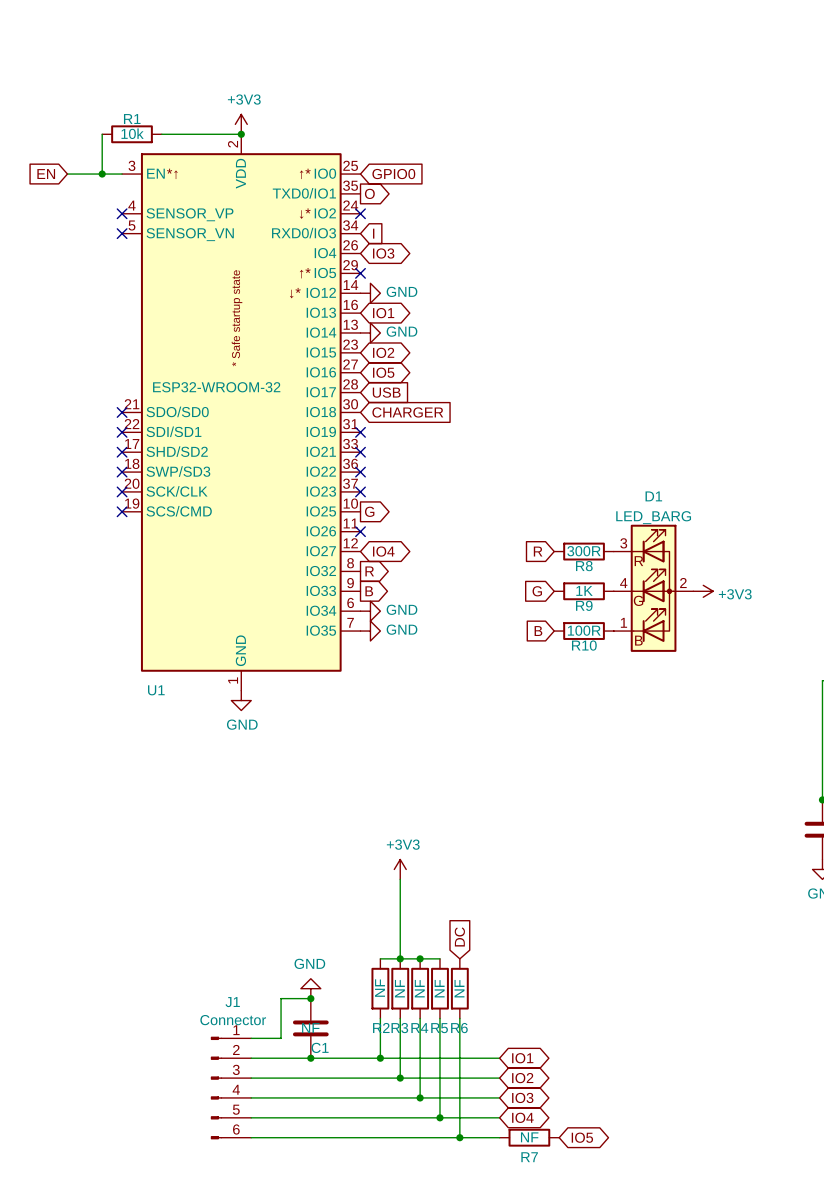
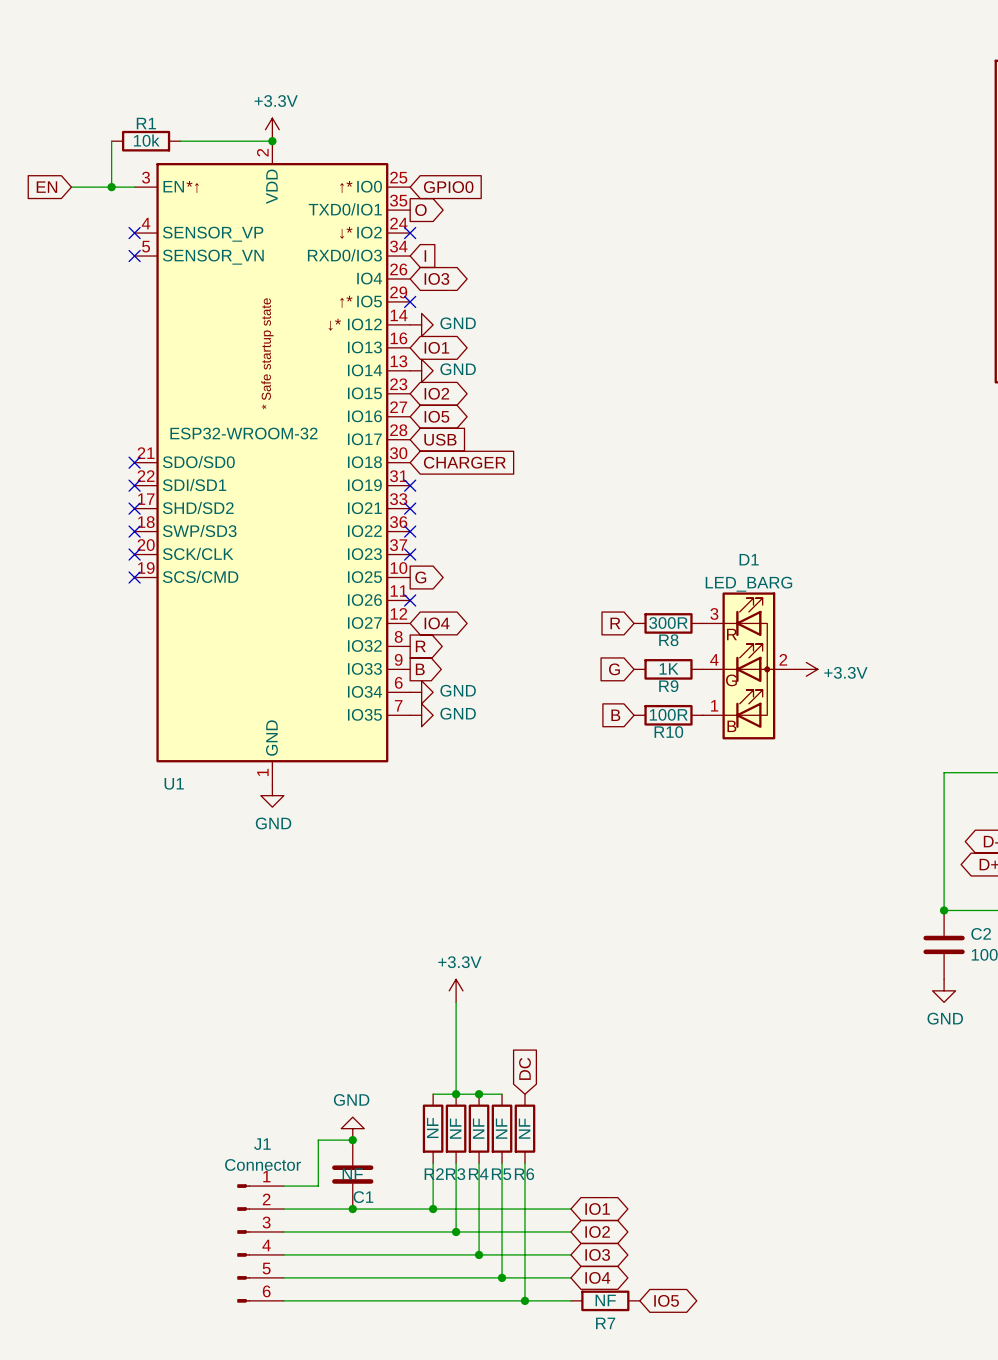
power symbol: +3V3 (241, 124) -> +3.3V (272, 129)
power symbol: +3V3 (703, 591) -> +3.3V (806, 669)
power symbol: +3V3 (400, 869) -> +3.3V (456, 990)

